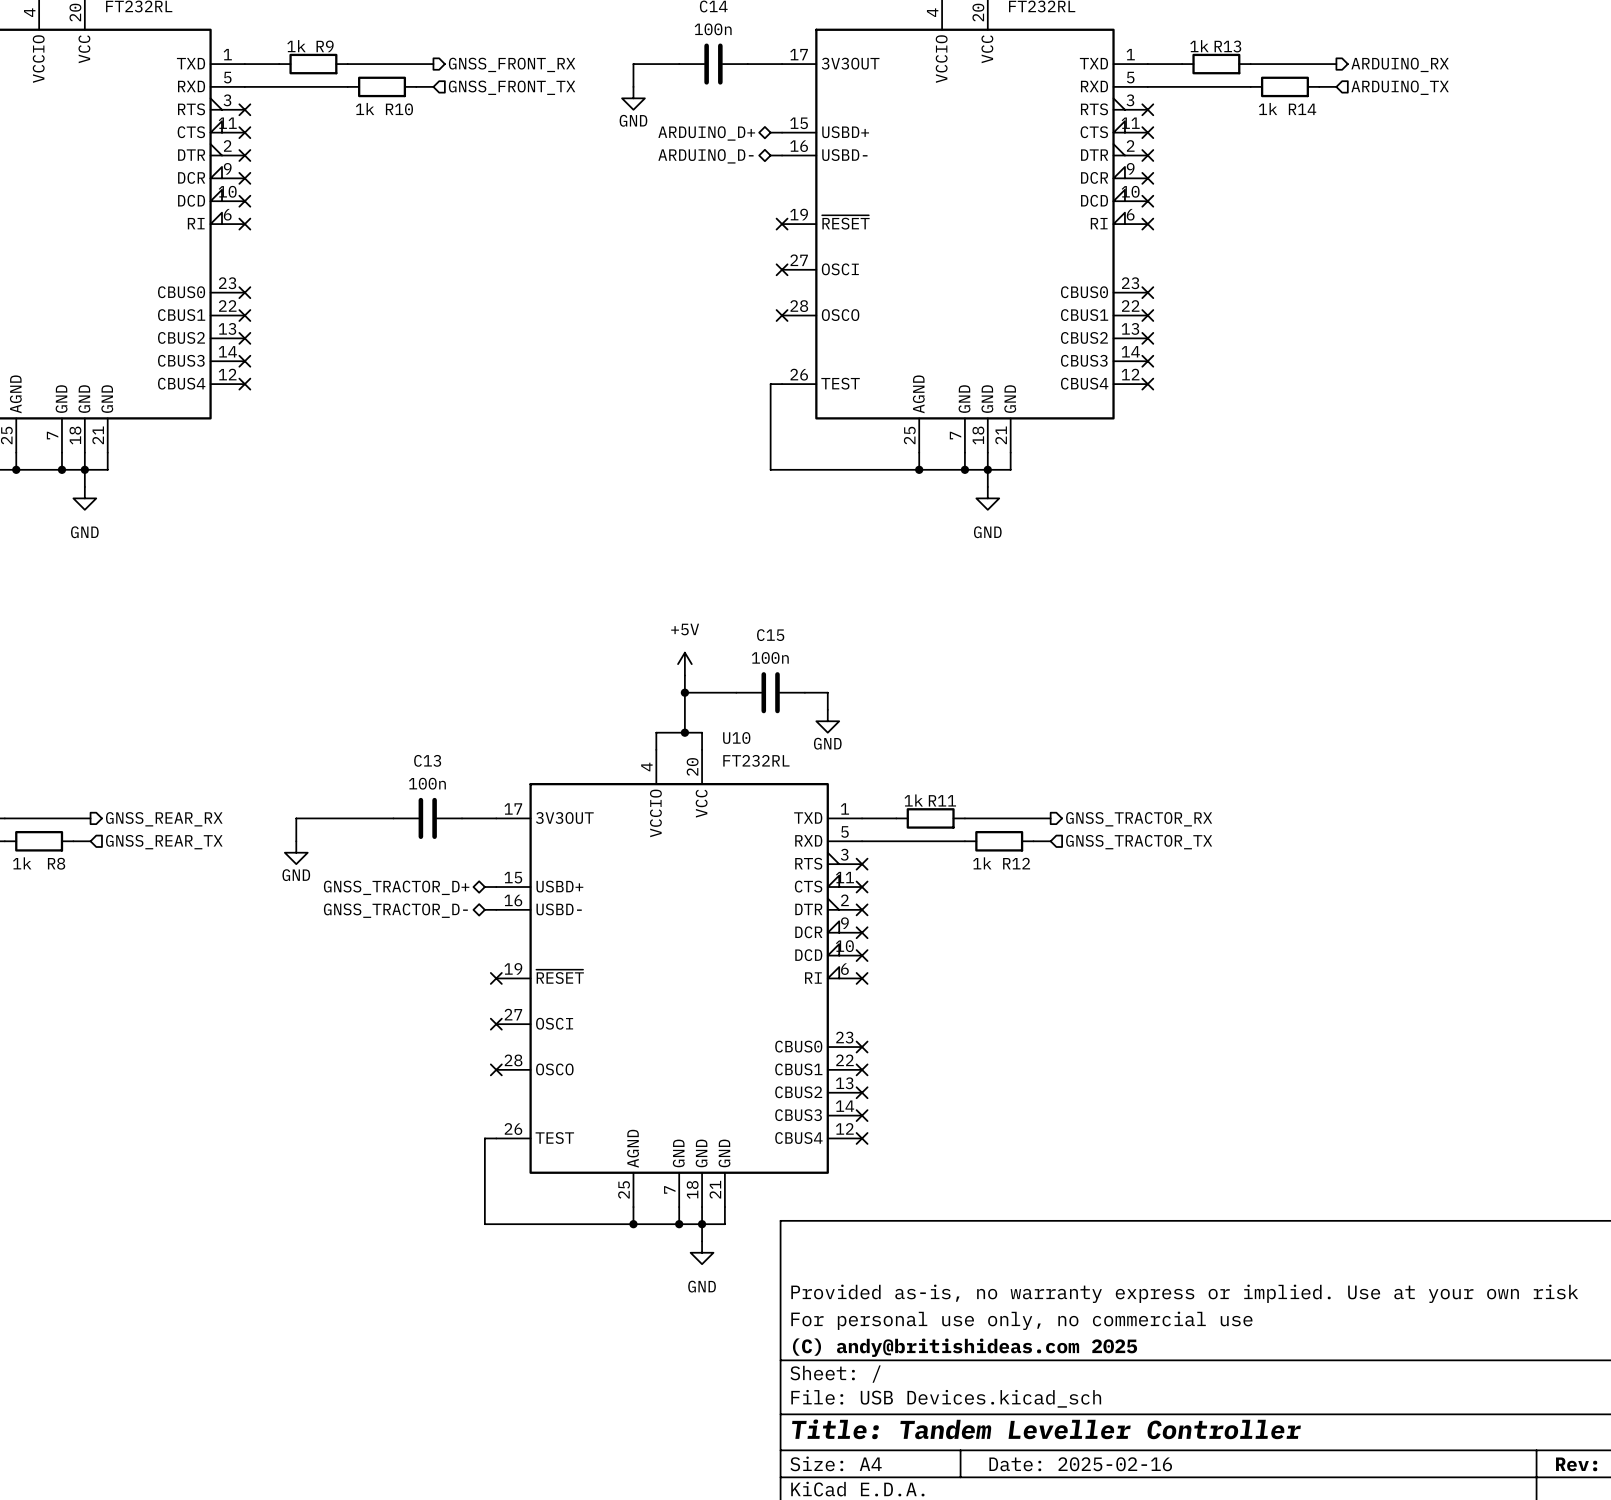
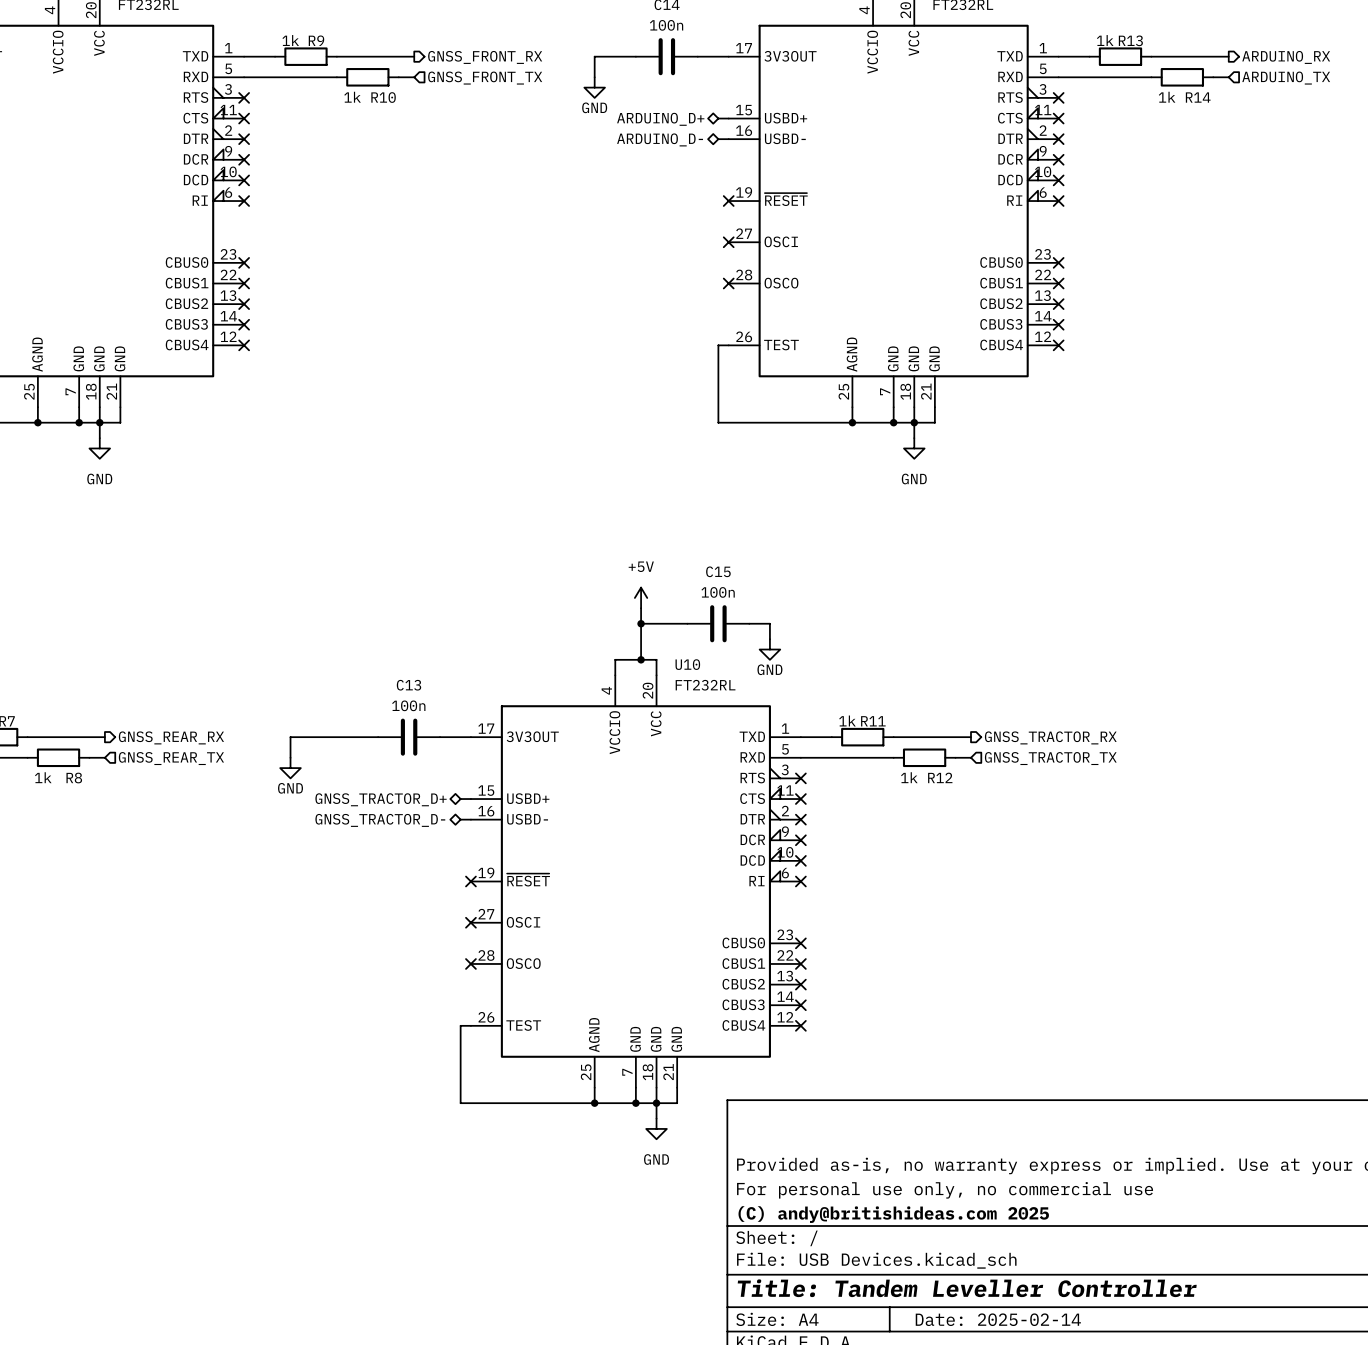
title block: Date: 2025-02-16 (1080, 1464) -> Date: 2025-02-14 (998, 1319)

